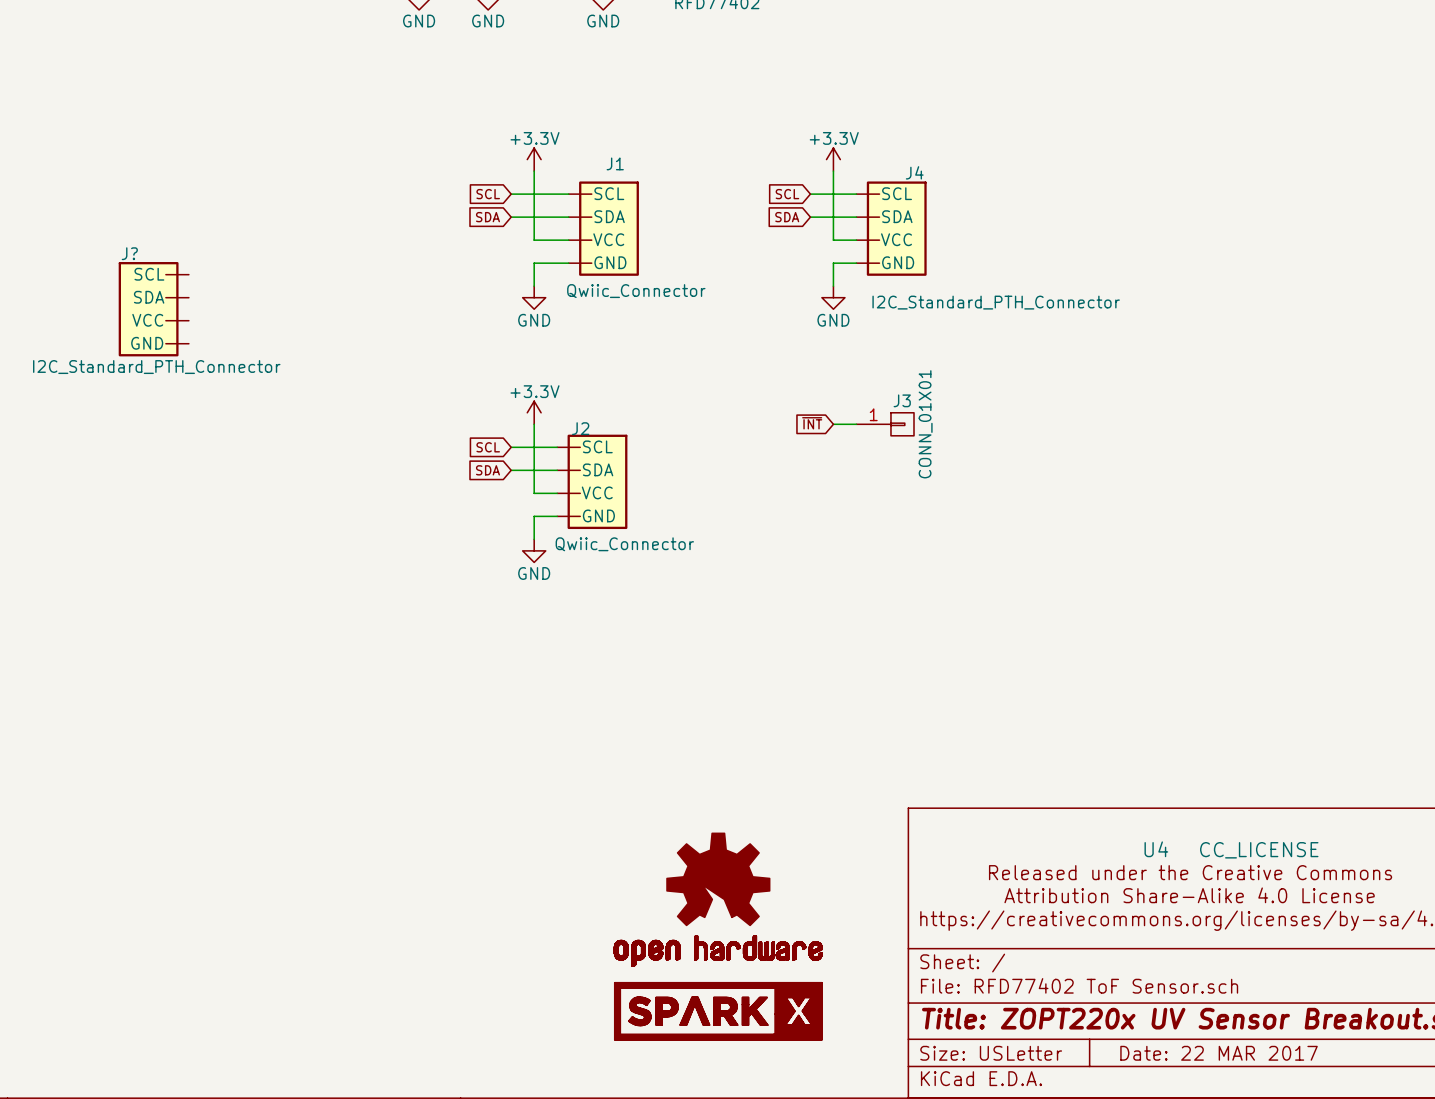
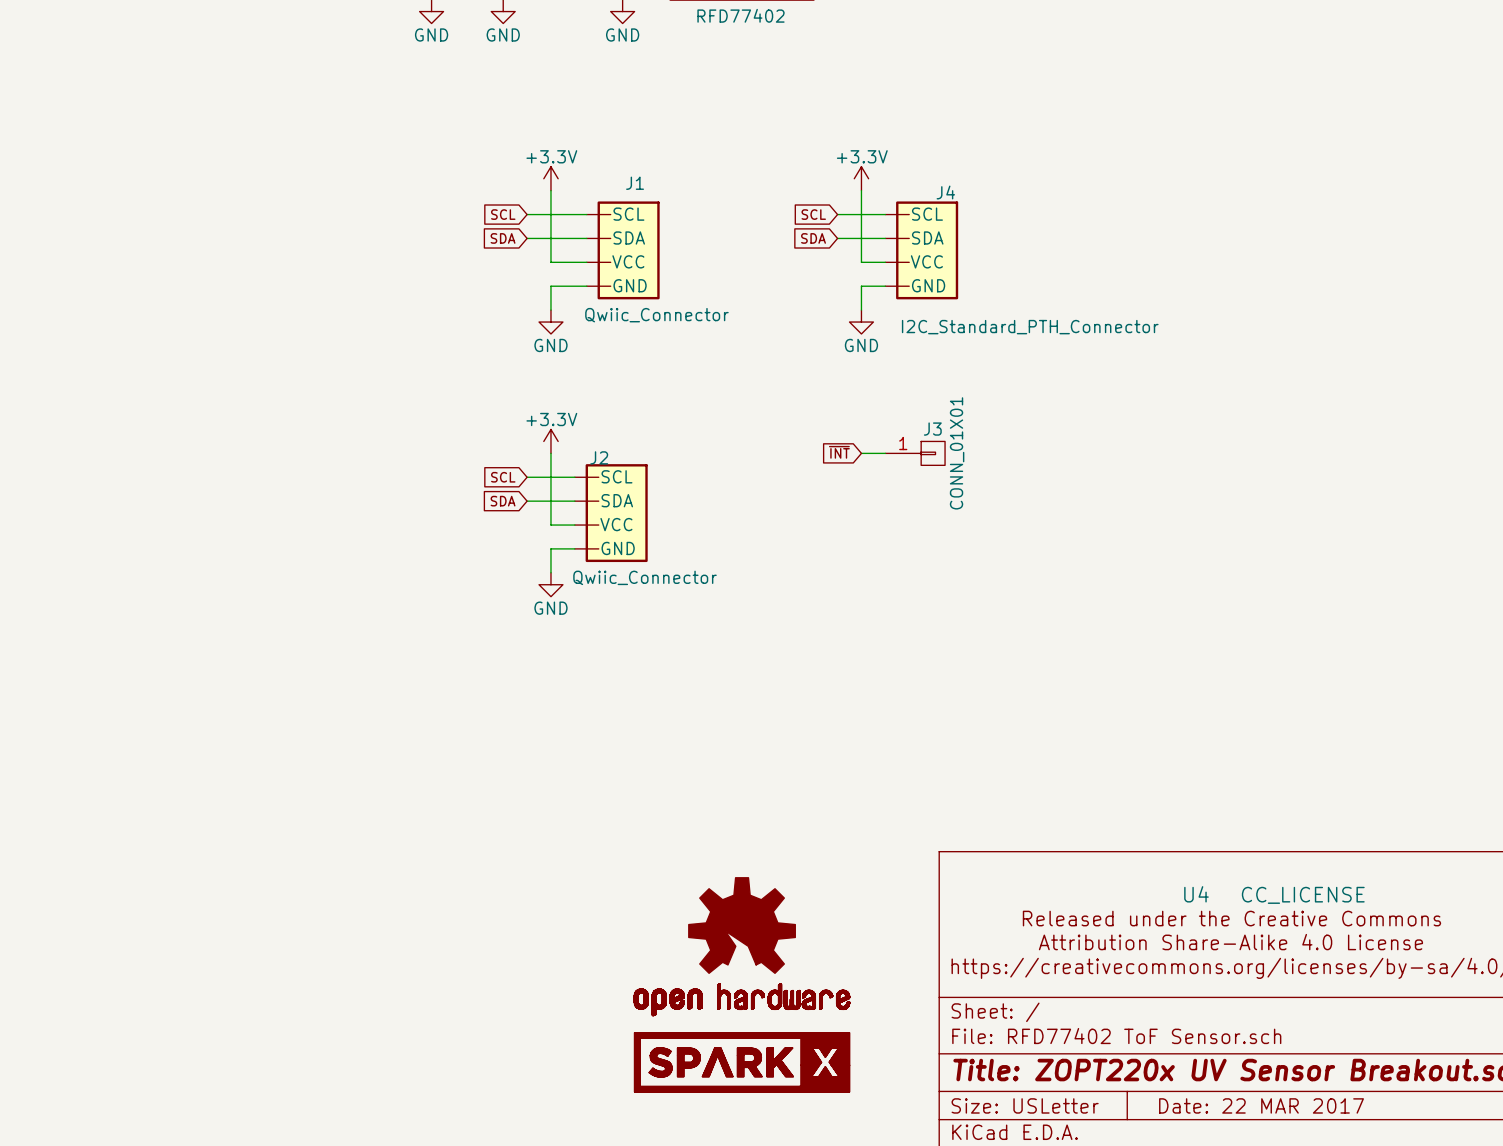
J?: I2C_Standard_PTH_Connector (153, 309) -> none

